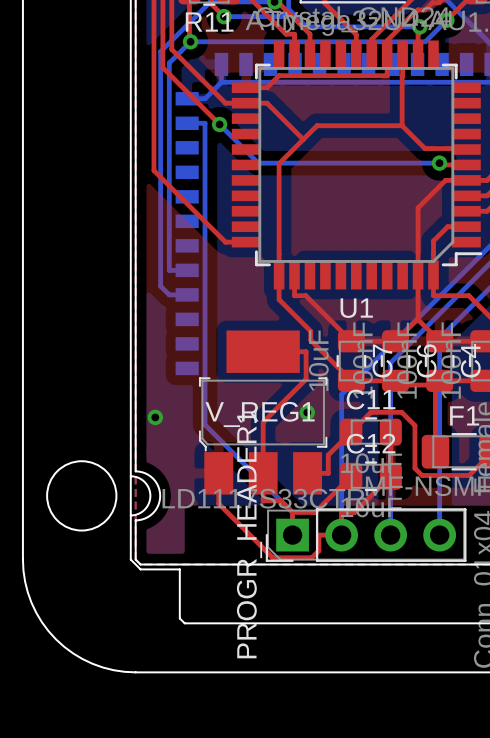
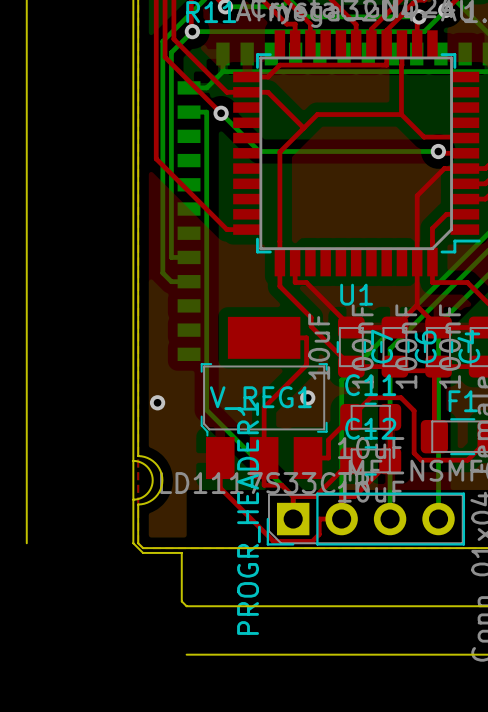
round board edge: [46, 460, 118, 532] -> none
board edge: (22, 559) (25, 581) (36, 612) (55, 639) (73, 653) (92, 663) (113, 670) (184, 672) -> none

